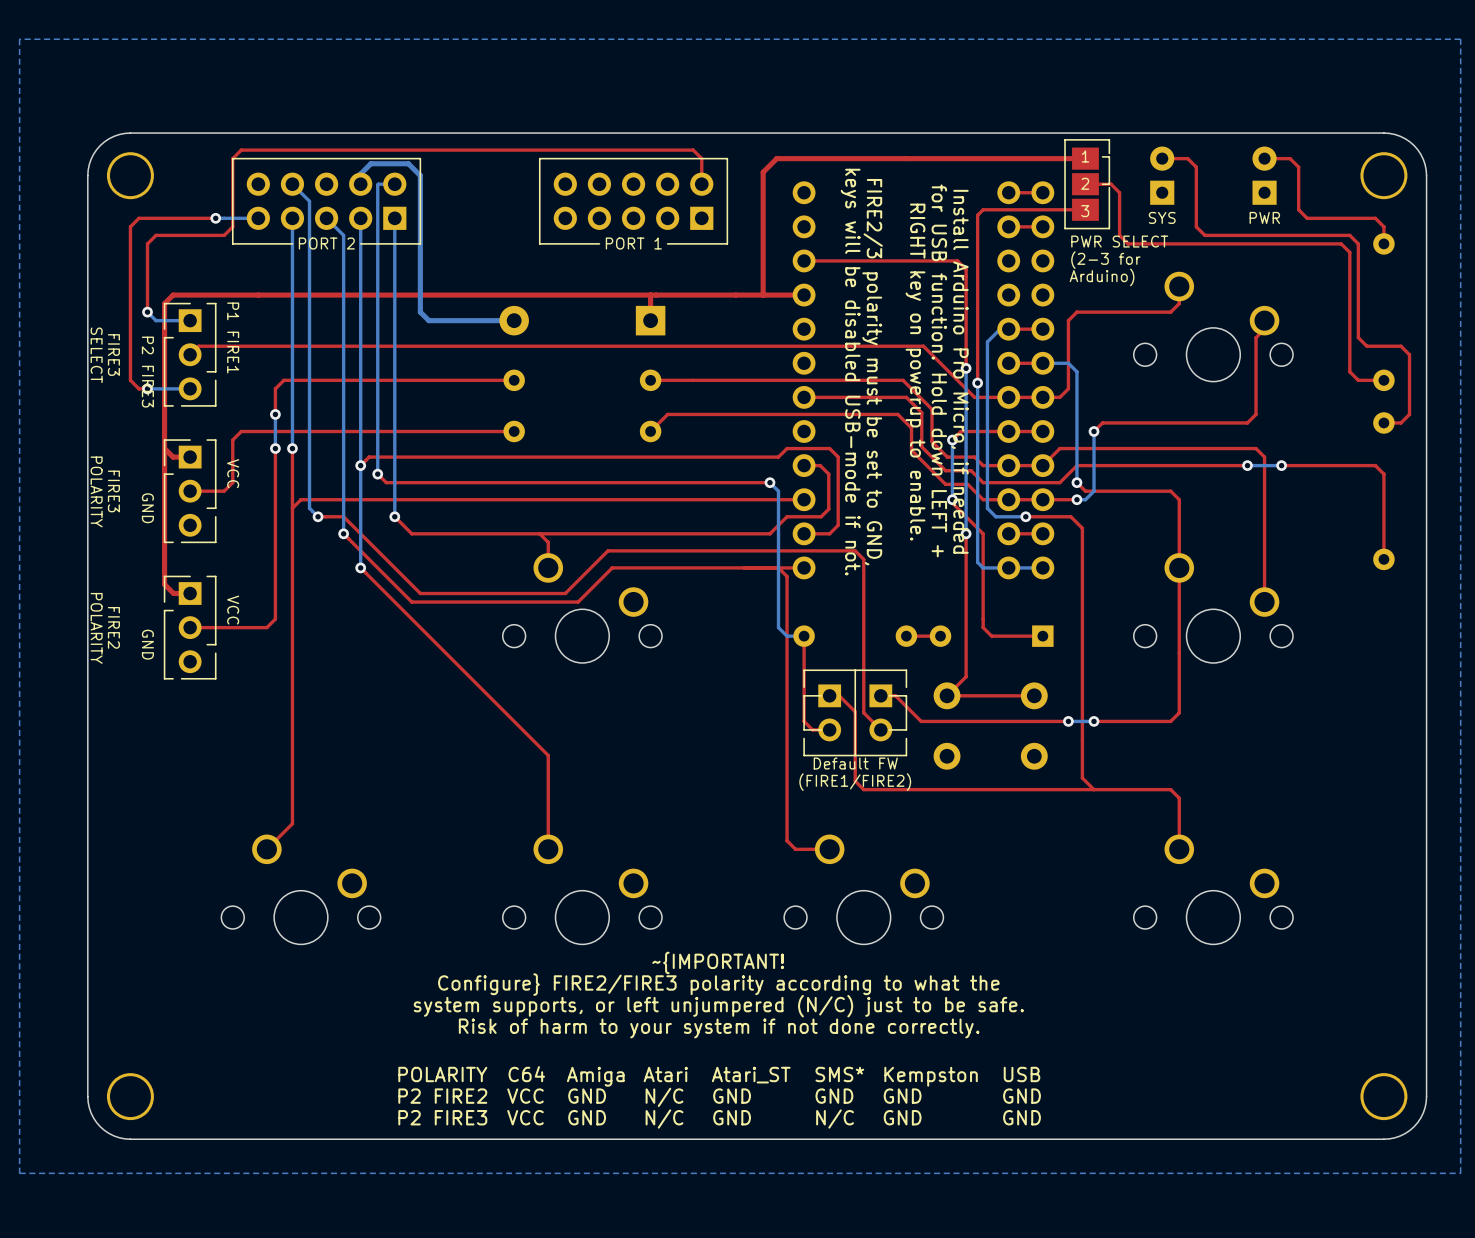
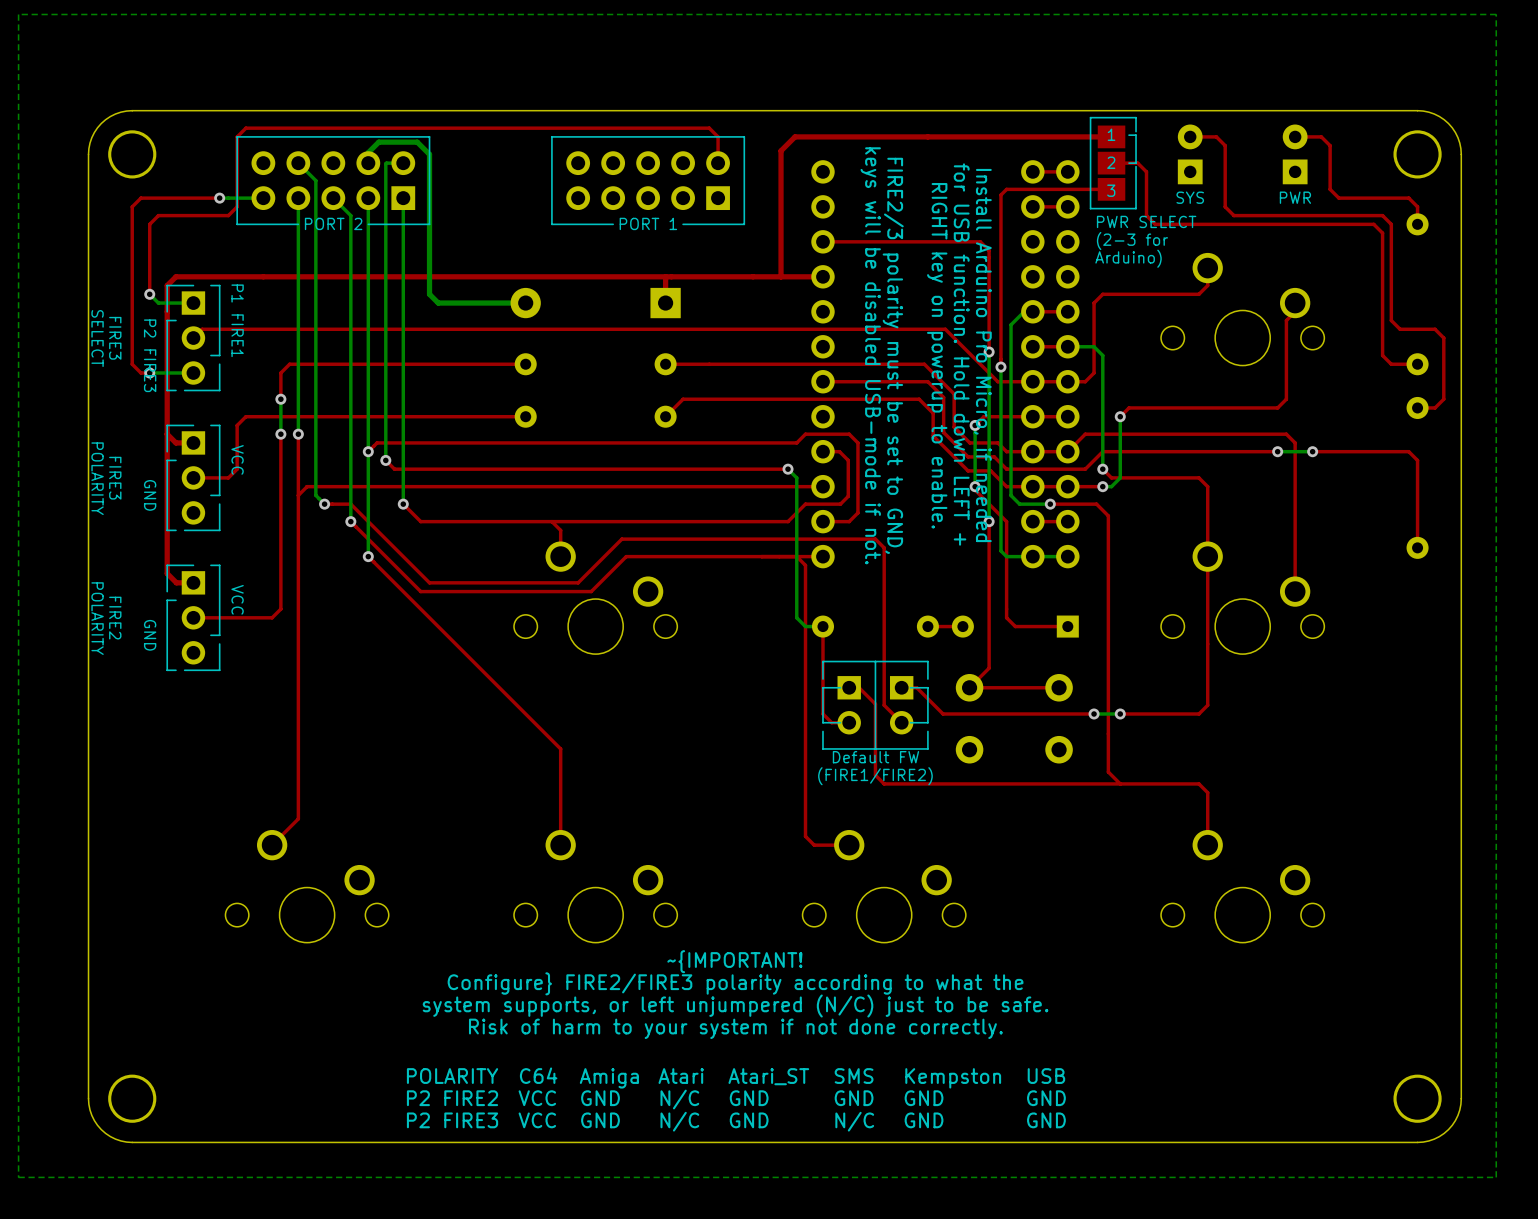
text: SMS* (839, 1074) -> SMS (854, 1076)

